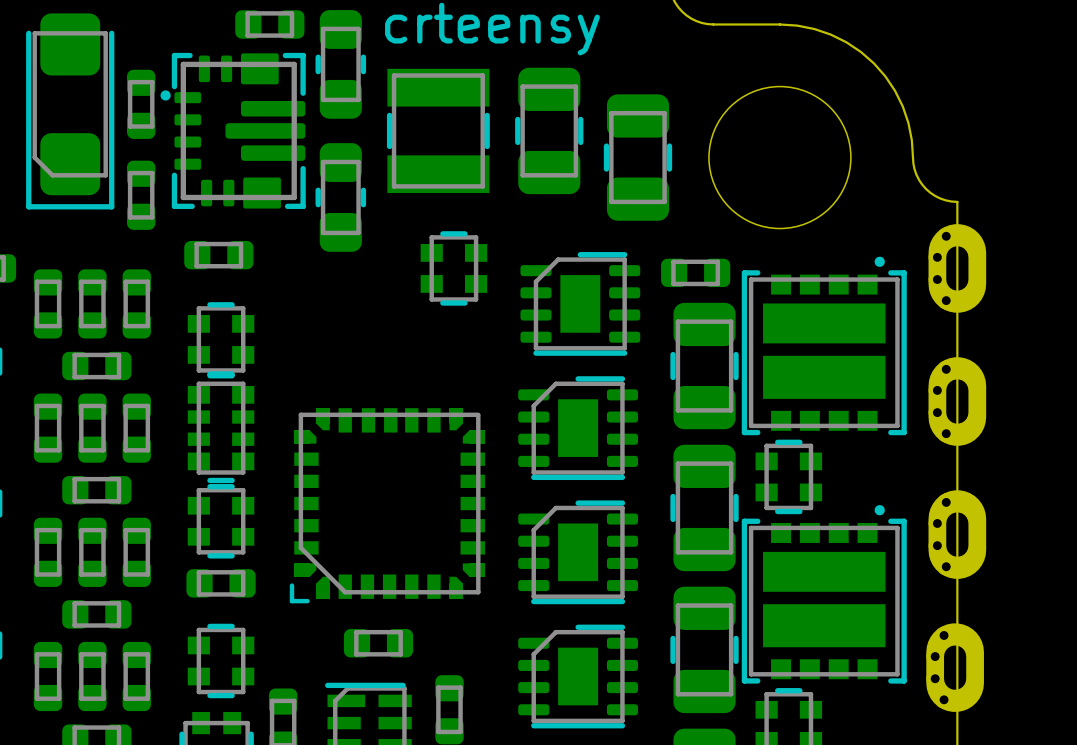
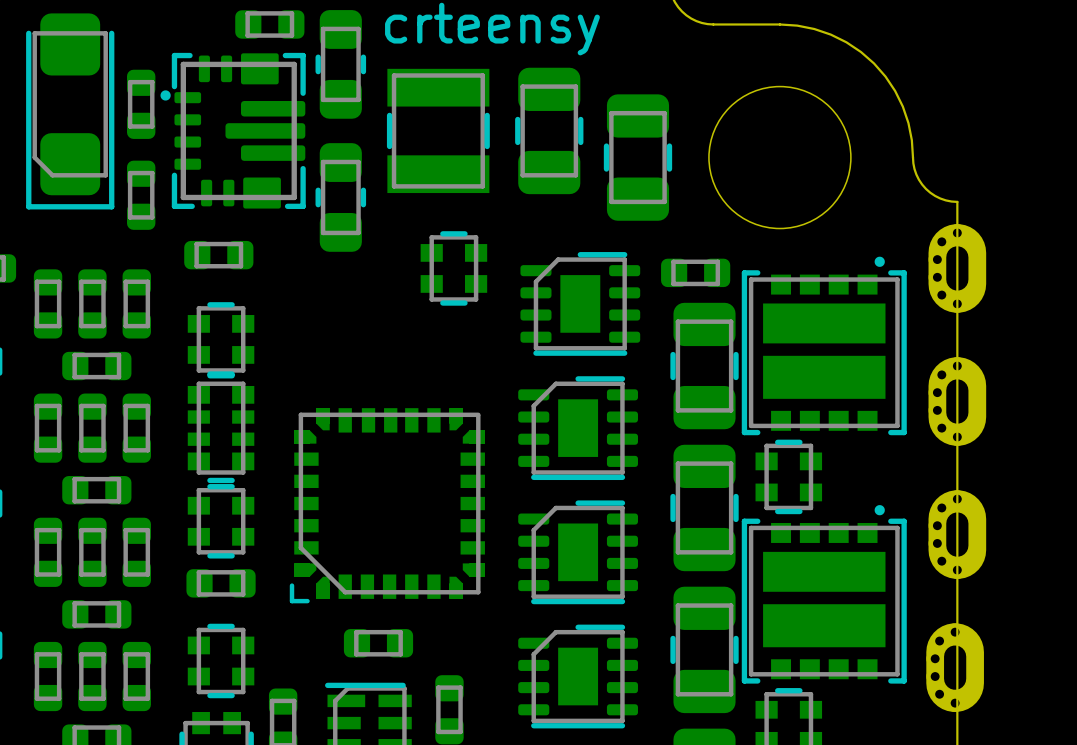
part footprint: [928, 224, 987, 313] -> [928, 224, 987, 313]
part footprint: [928, 357, 987, 446] -> [928, 357, 987, 446]
part footprint: [928, 490, 987, 579] -> [928, 490, 987, 579]
part footprint: [926, 623, 984, 713] -> [926, 623, 984, 713]

